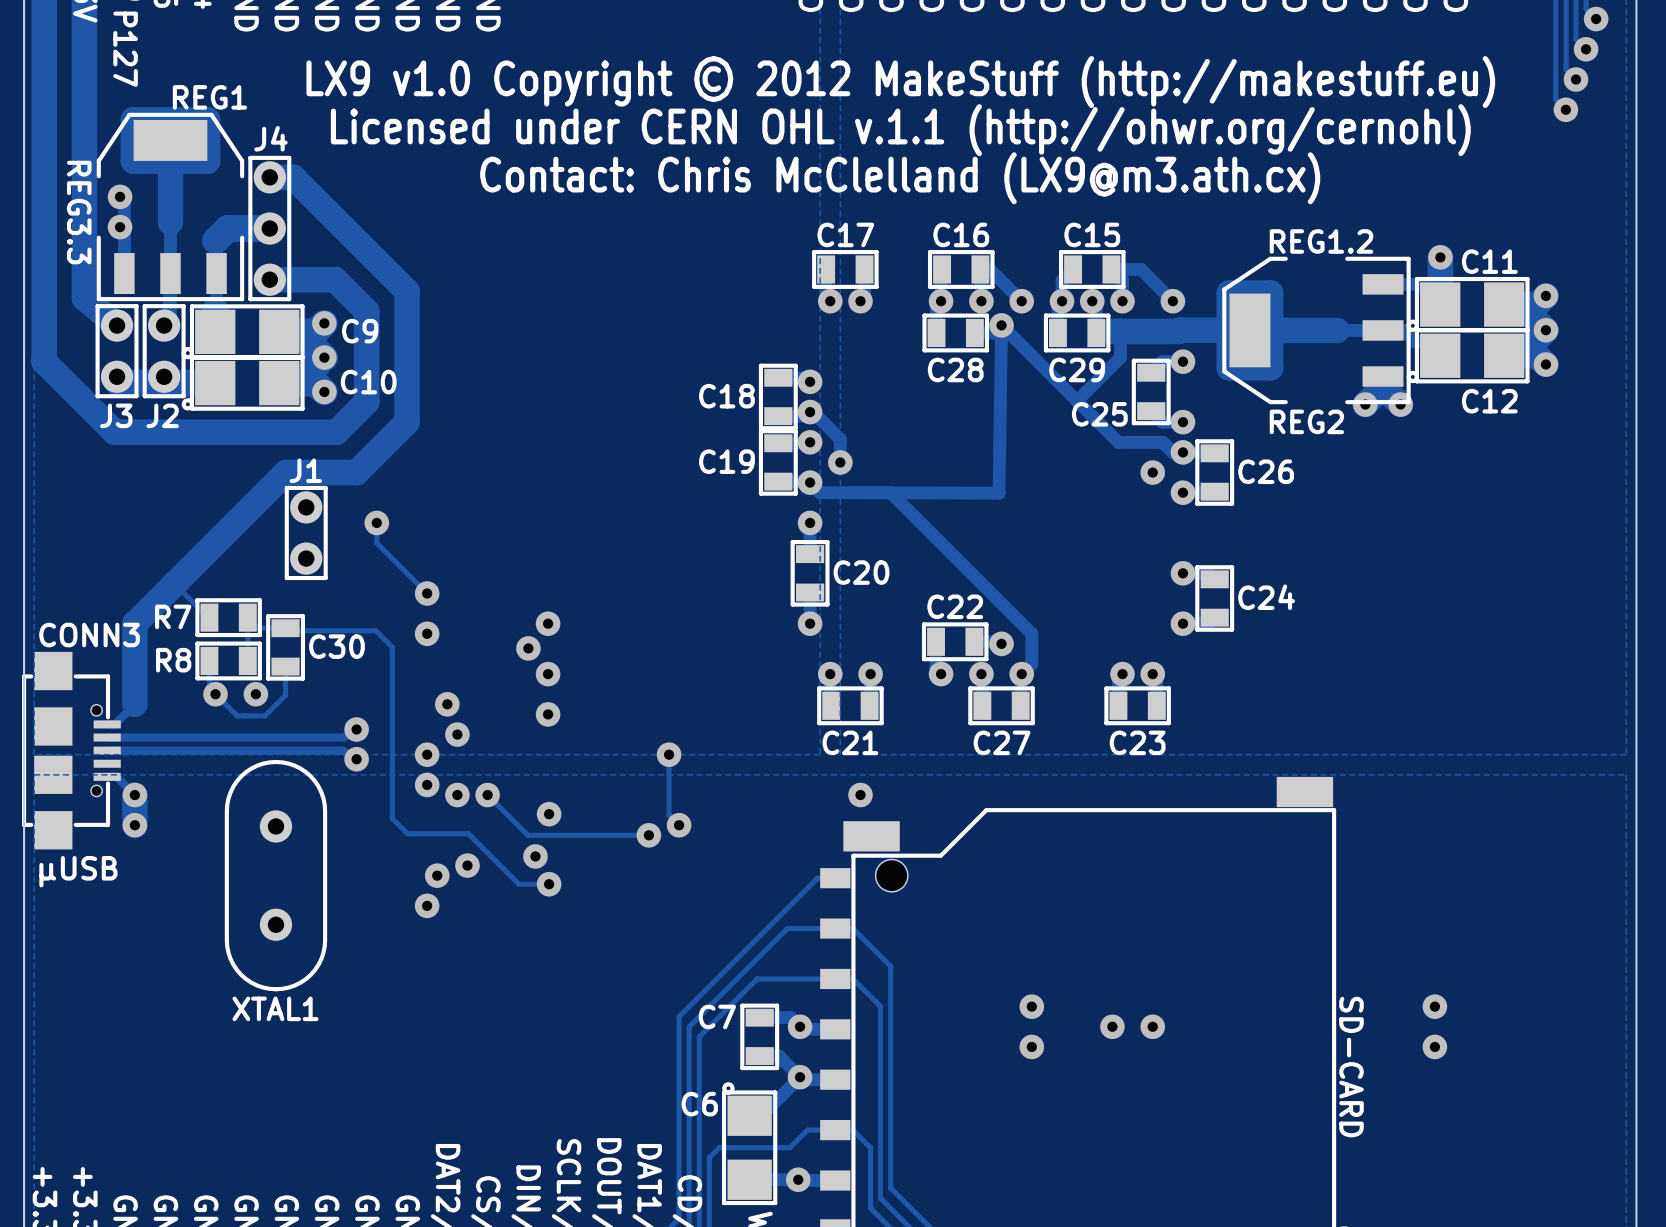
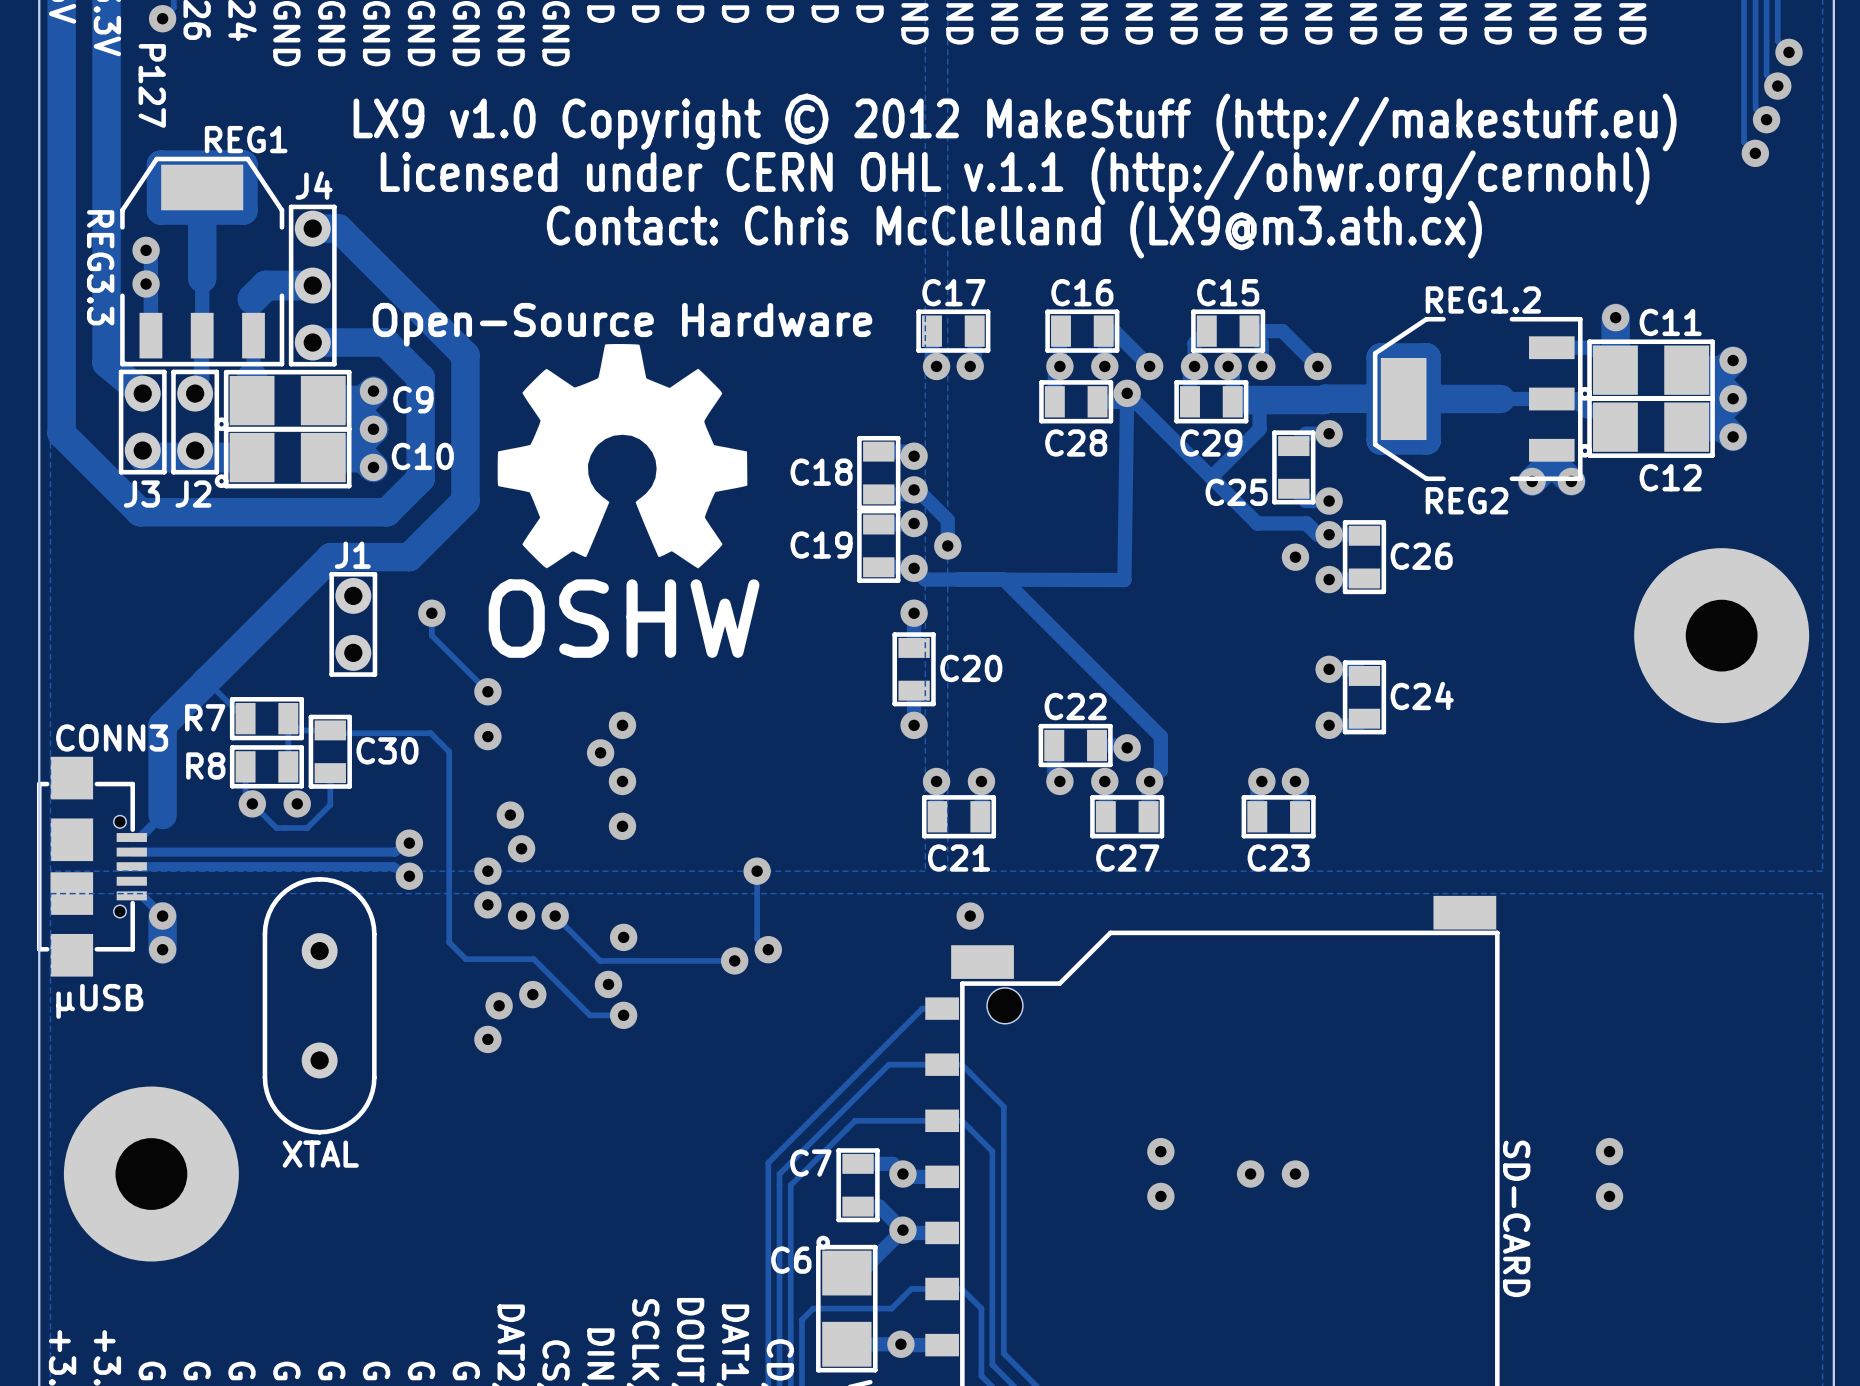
Open-Source Hardware: none -> OSHW (622, 456)
part: none -> (1721, 635)
XTAL1 name: XTAL1 (275, 1008) -> XTAL (320, 1154)
part: none -> (151, 1174)

